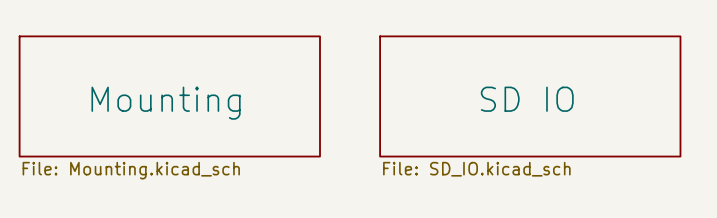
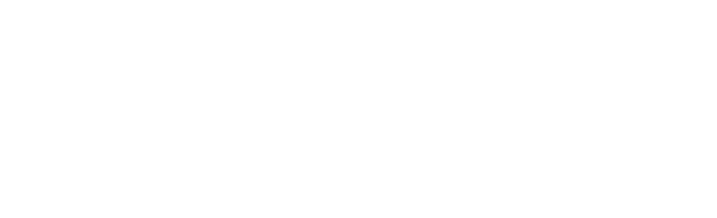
sheet Mounting: File: Mounting.kicad_sch (169, 96) -> none
sheet SD IO: File: SD_IO.kicad_sch (530, 96) -> none

